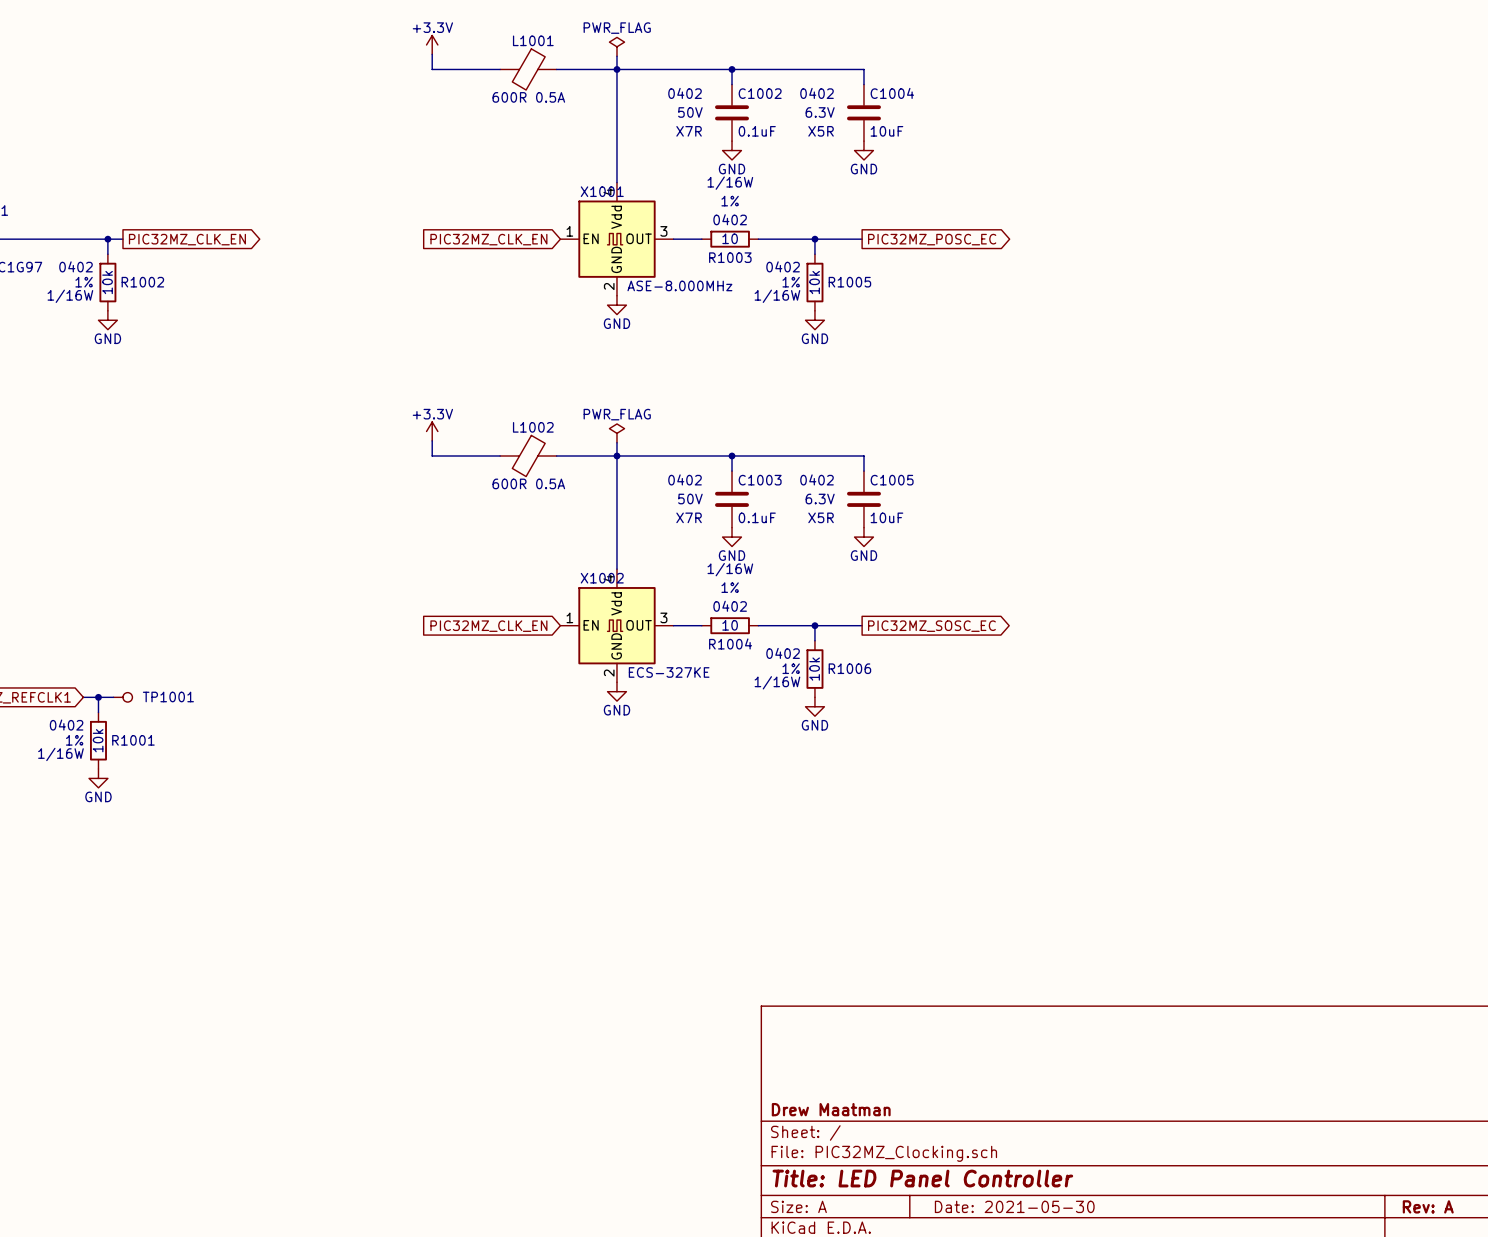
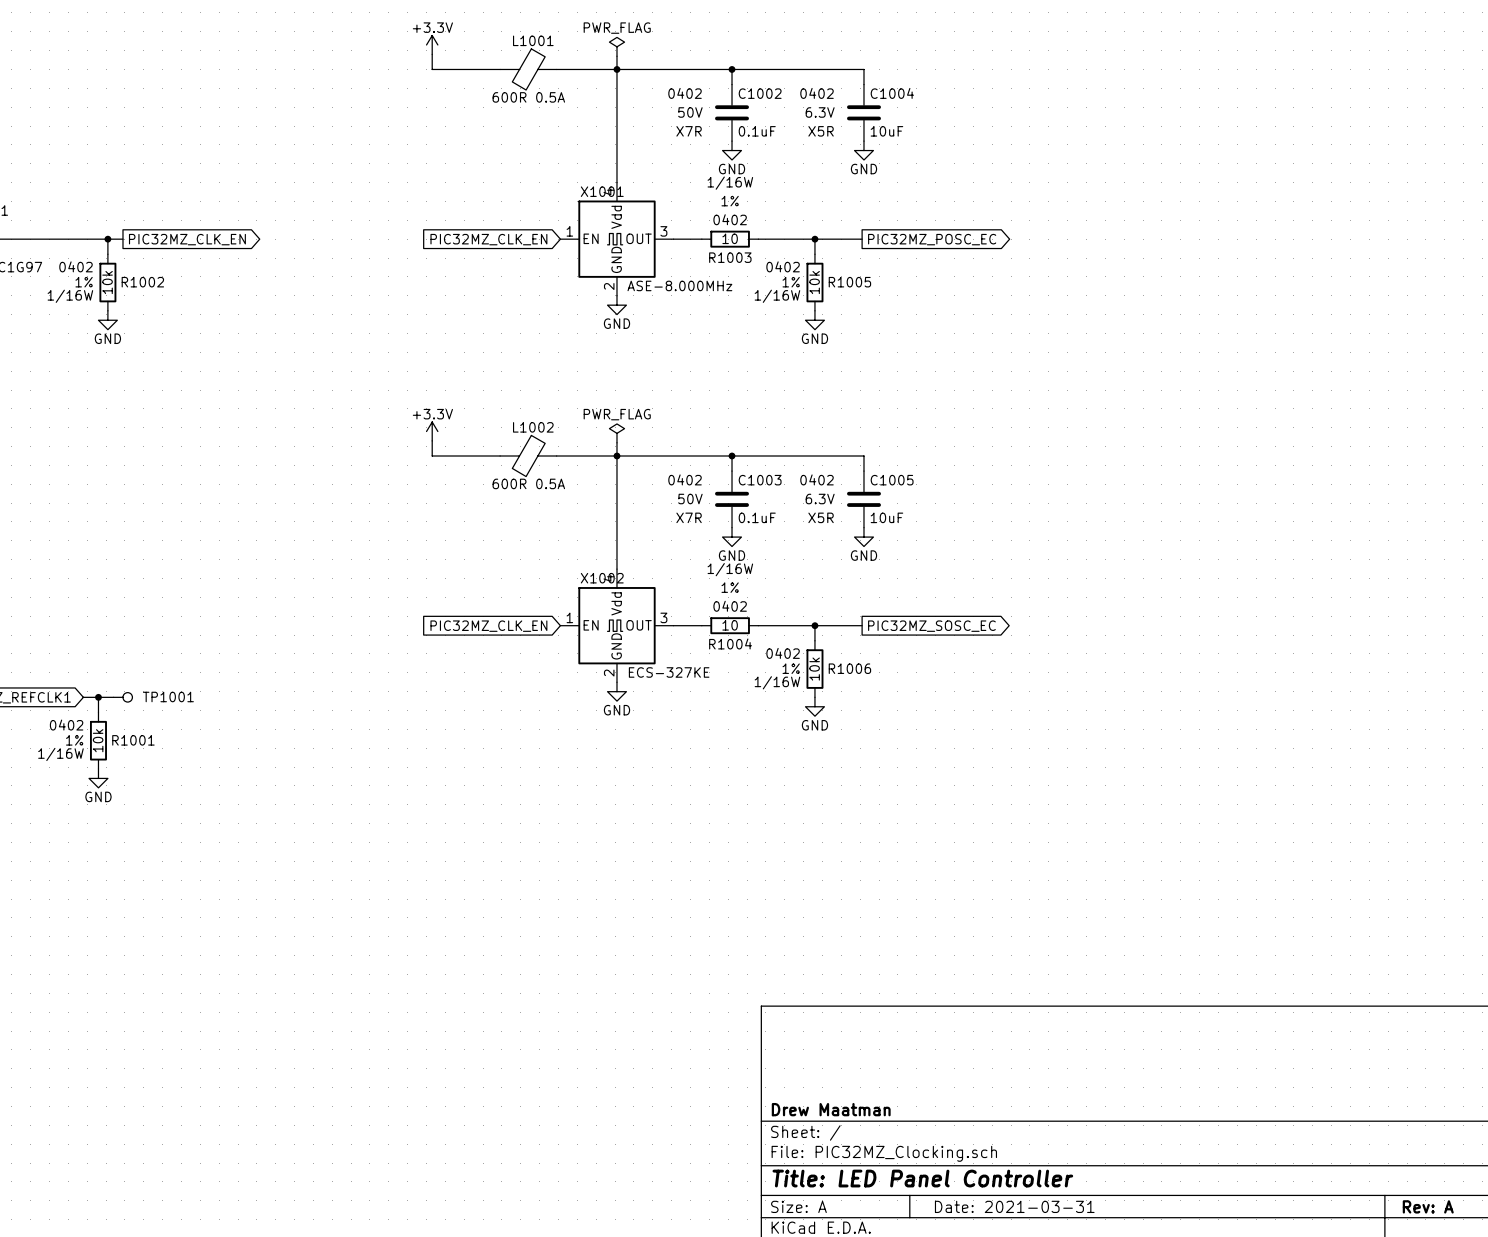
title block: Date: 2021-05-30 (1014, 1206) -> Date: 2021-03-31 (1014, 1206)

